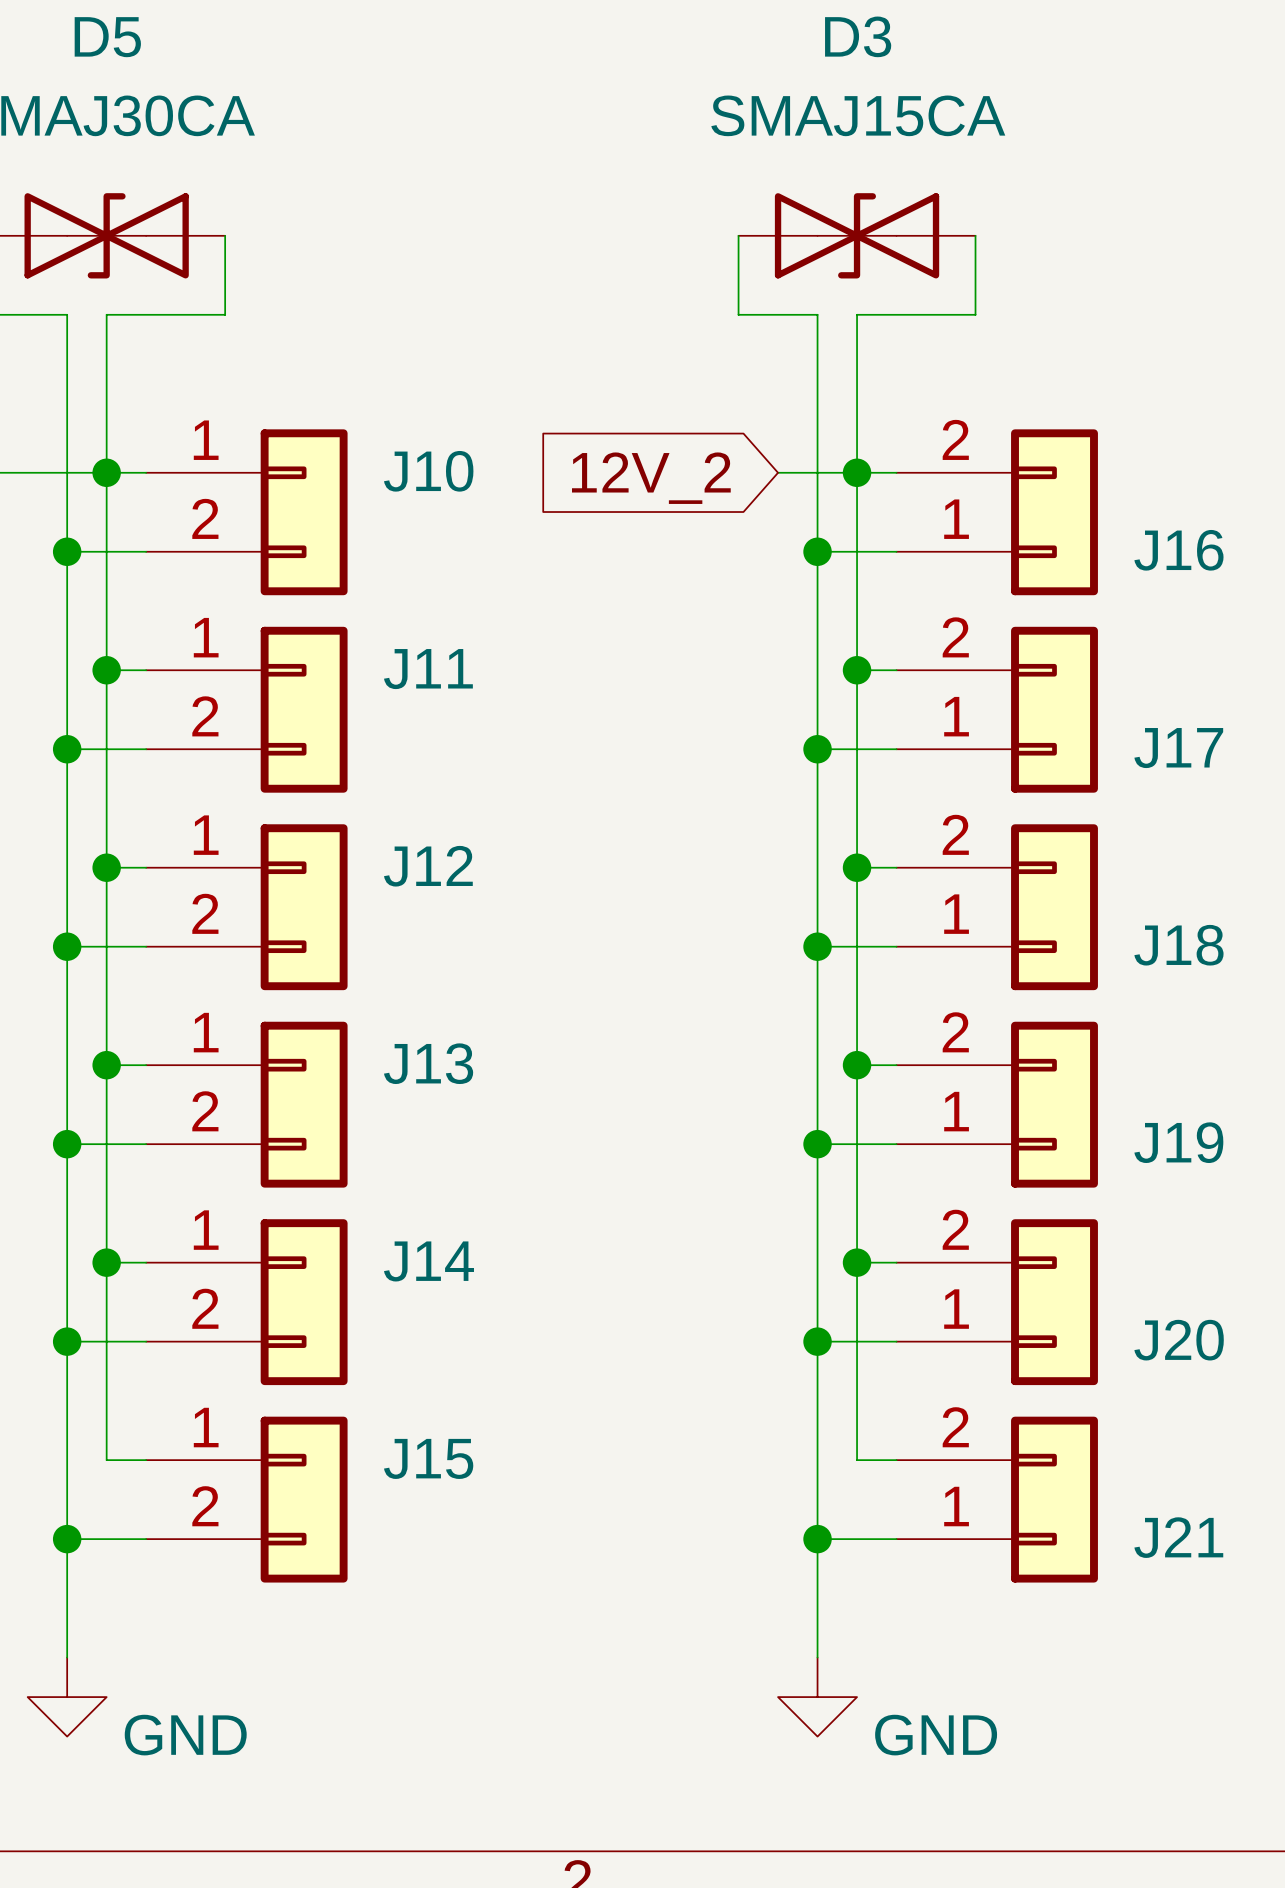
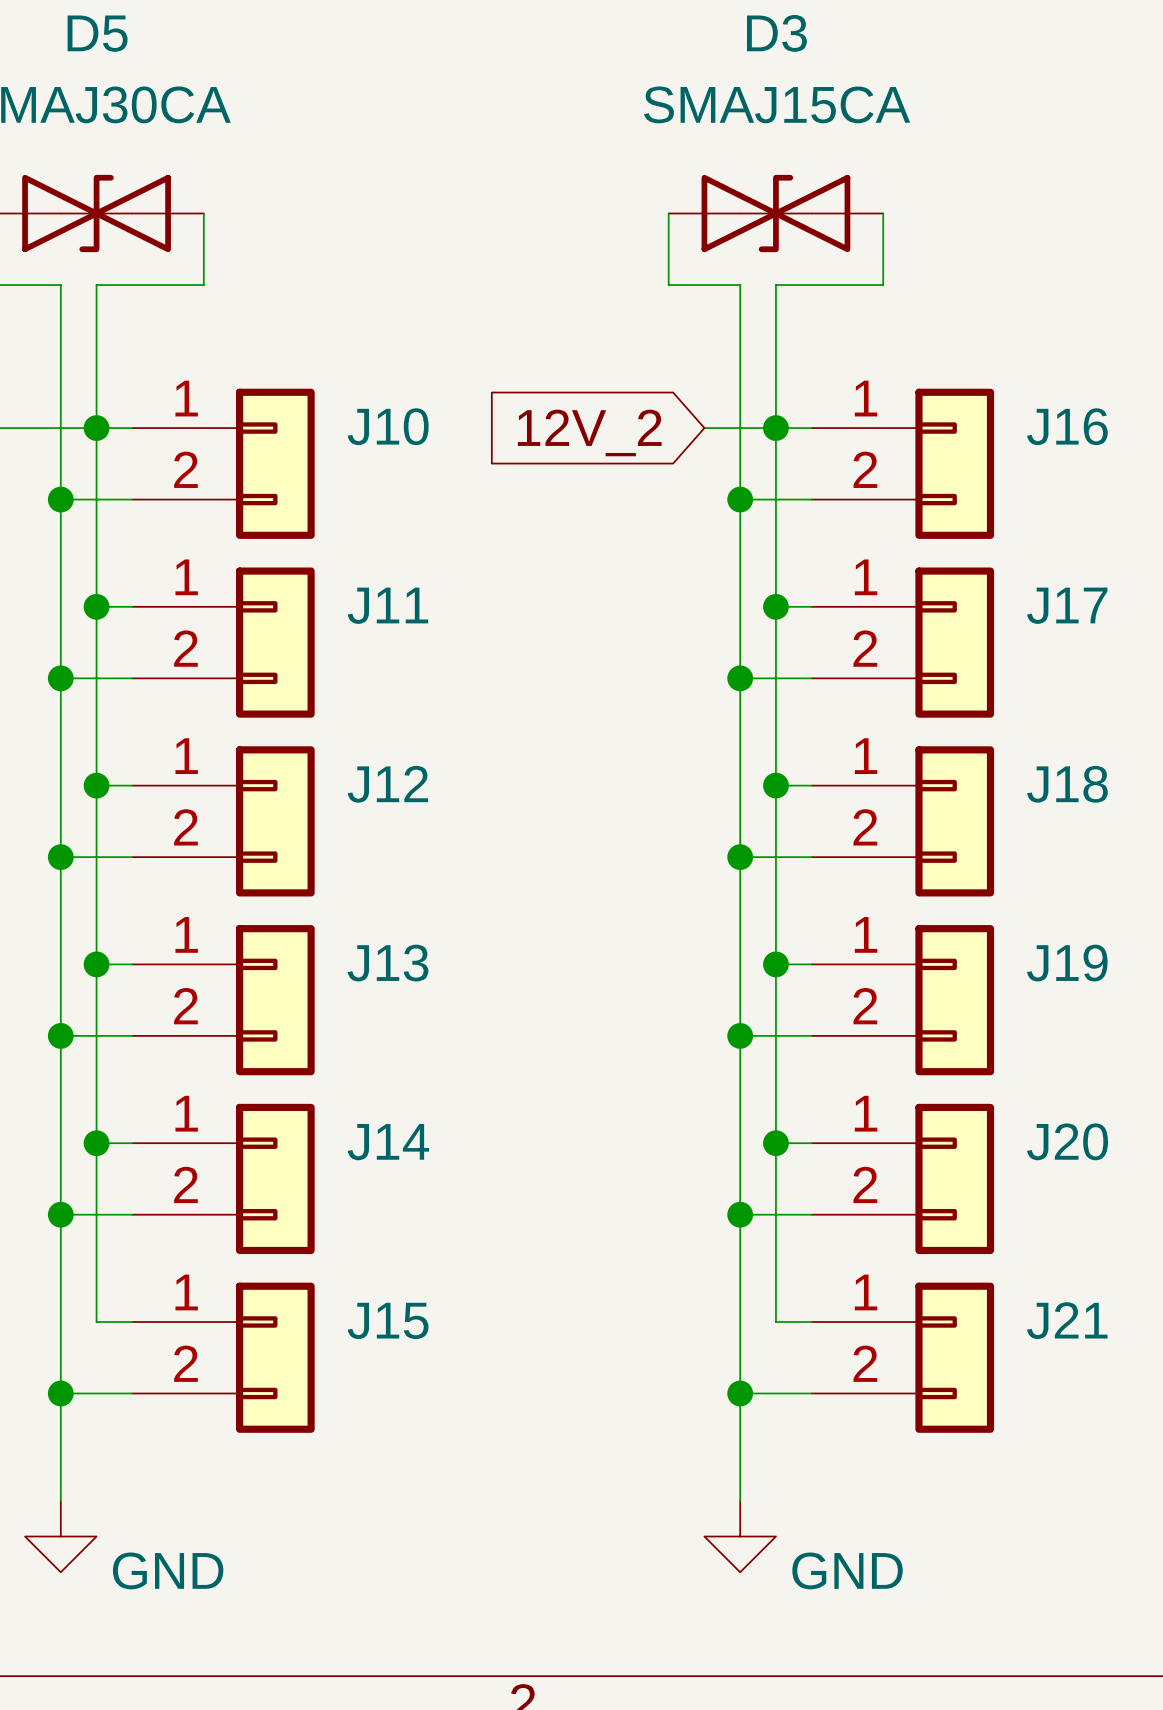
J16 flip: as is (1054, 512) -> up-down (954, 463)
J17 flip: as is (1054, 709) -> up-down (954, 642)
J18 flip: as is (1054, 907) -> up-down (954, 821)
J19 flip: as is (1054, 1104) -> up-down (954, 1000)
J20 flip: as is (1054, 1302) -> up-down (954, 1178)
J21 flip: as is (1054, 1499) -> up-down (954, 1357)

